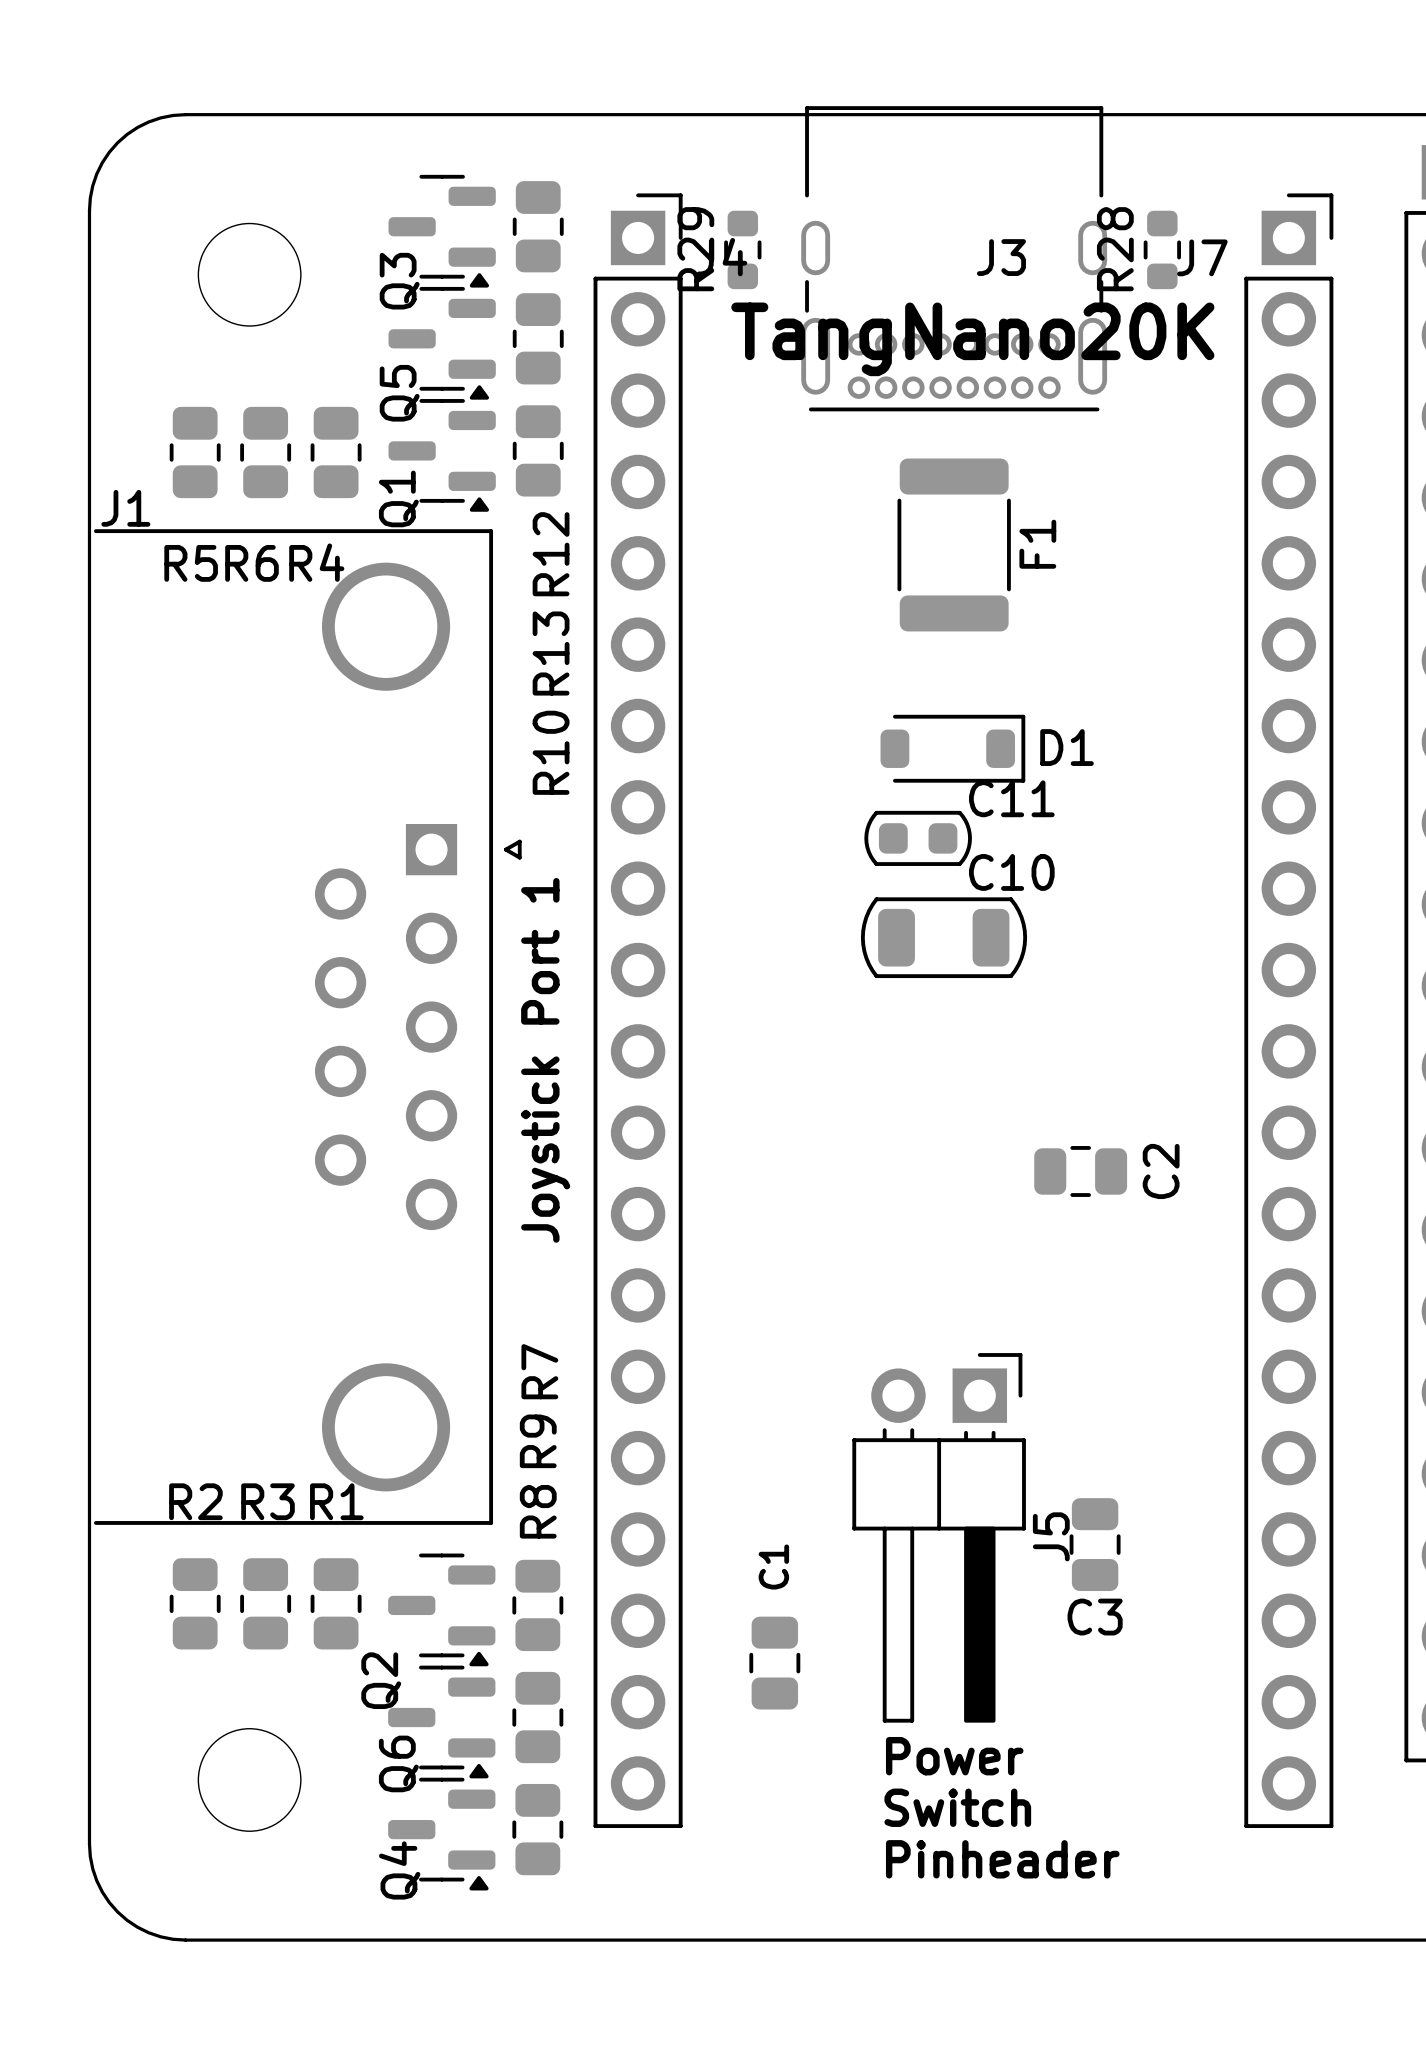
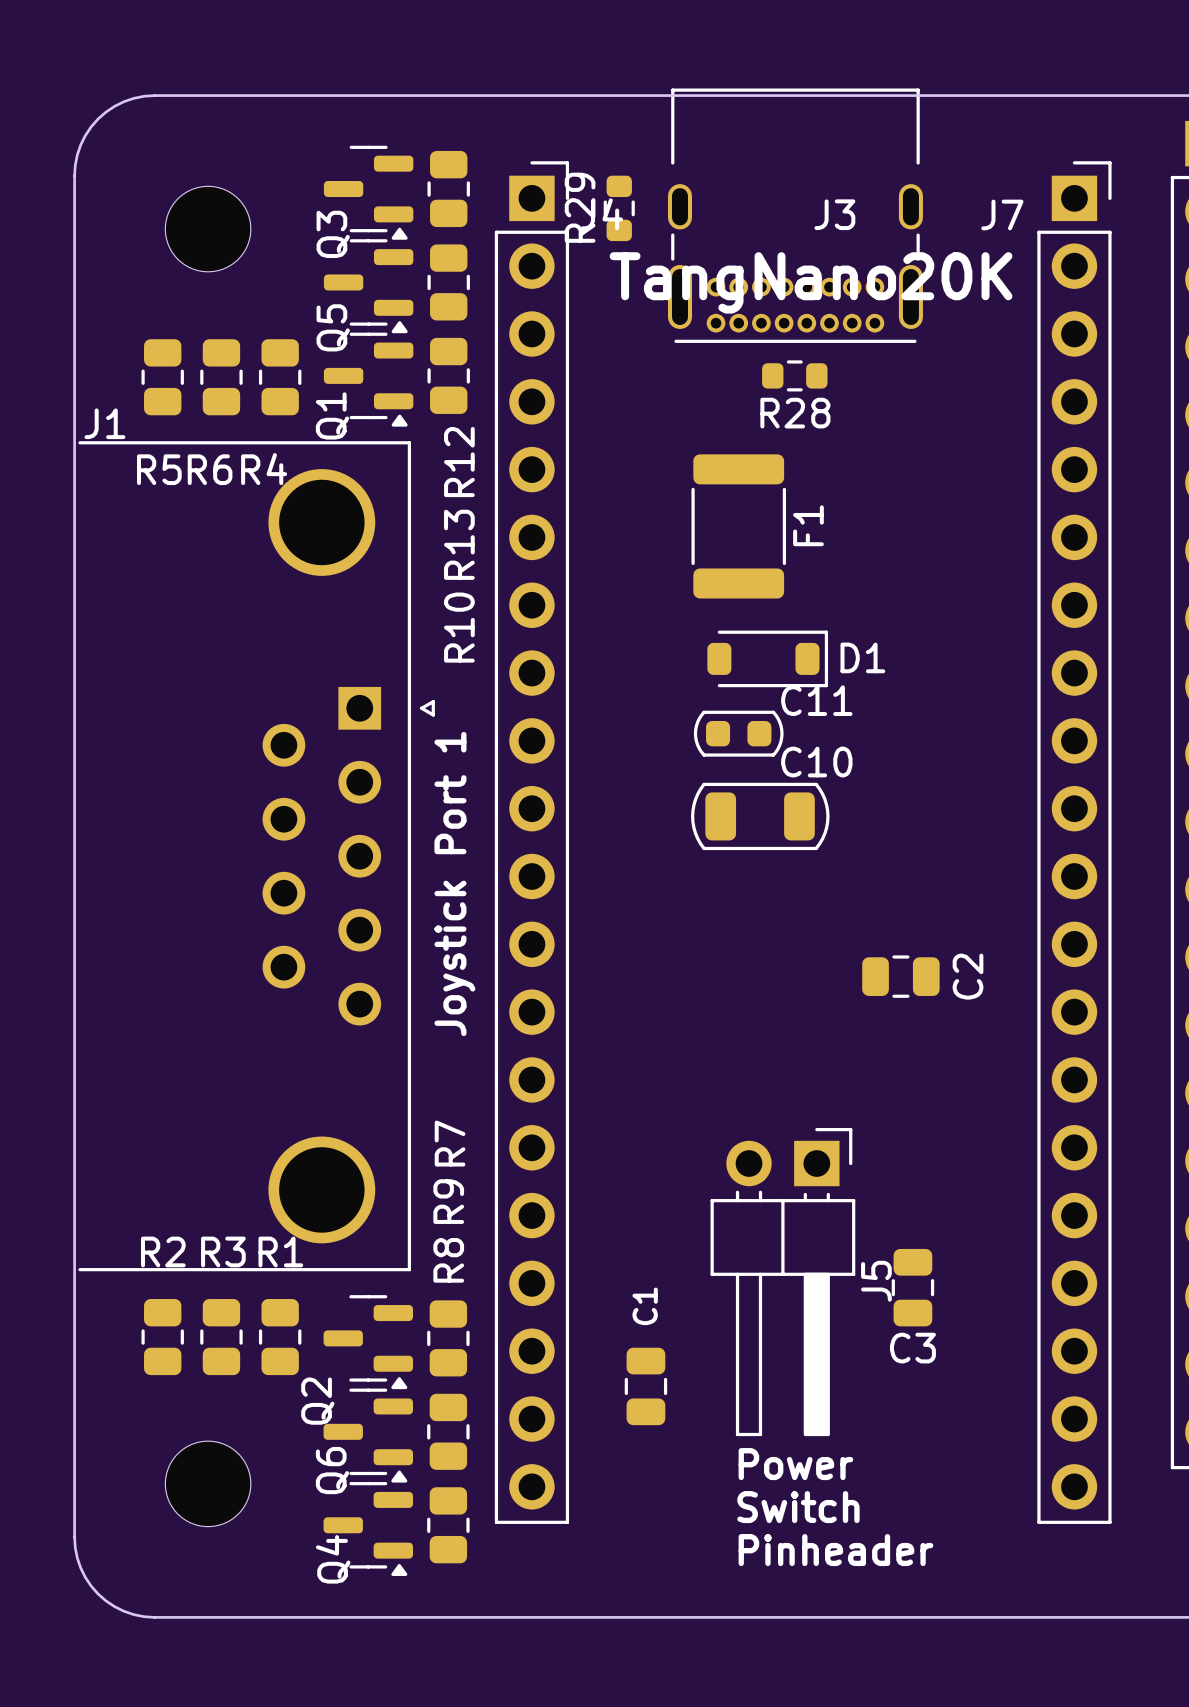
R28 name position: R28 (1115, 249) -> R28 (795, 413)
R28 rotation: 0° (1162, 249) -> 90° clockwise (794, 375)
R28 position: (1162, 249) -> (794, 375)
F1 position: (954, 544) -> (738, 526)
D1 position: (952, 748) -> (767, 658)
C11 position: (918, 838) -> (738, 733)
C10 position: (944, 937) -> (760, 816)

